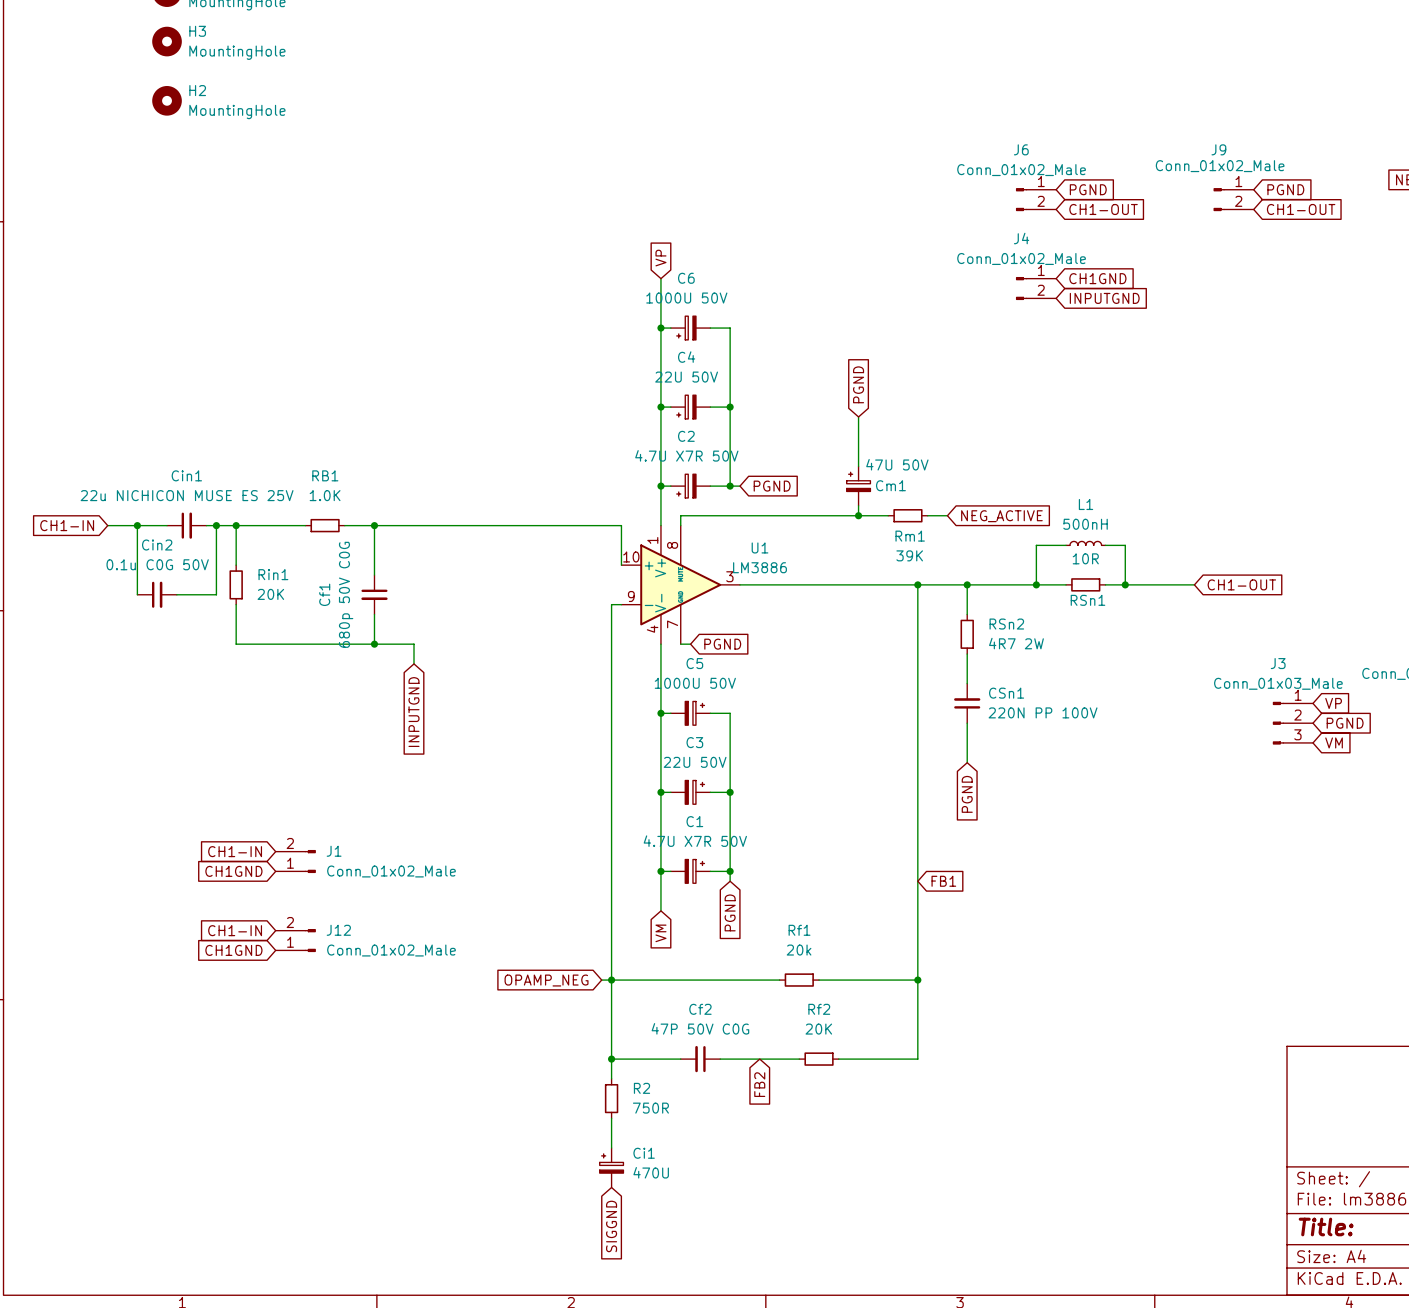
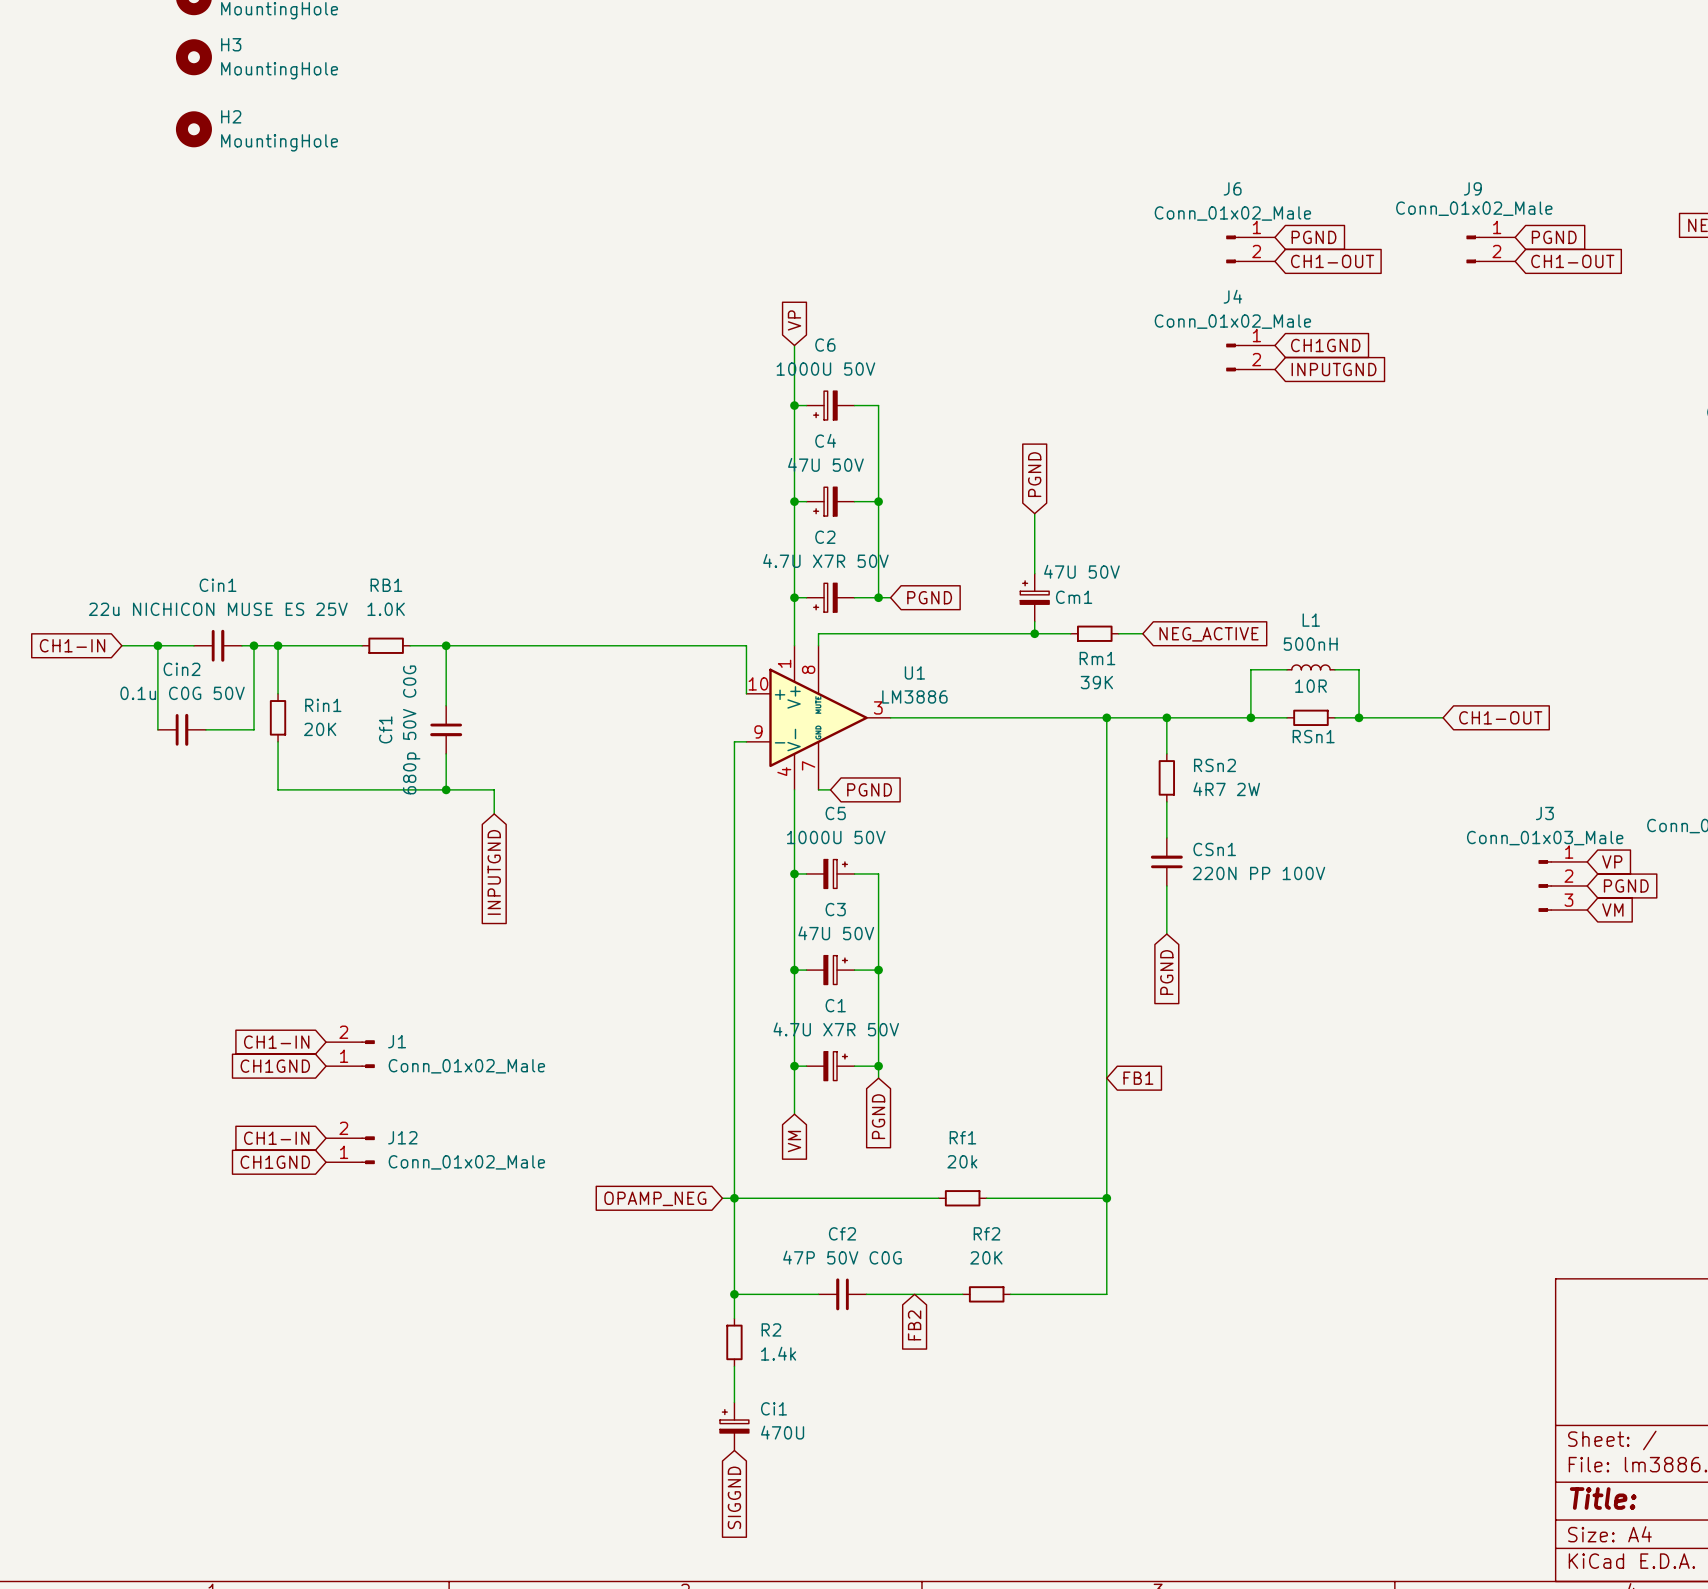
C4 value: 22U 50V (686, 377) -> 47U 50V (825, 464)
C3 value: 22U 50V (695, 762) -> 47U 50V (836, 933)
R2 value: 750R (650, 1108) -> 1.4k (778, 1353)

